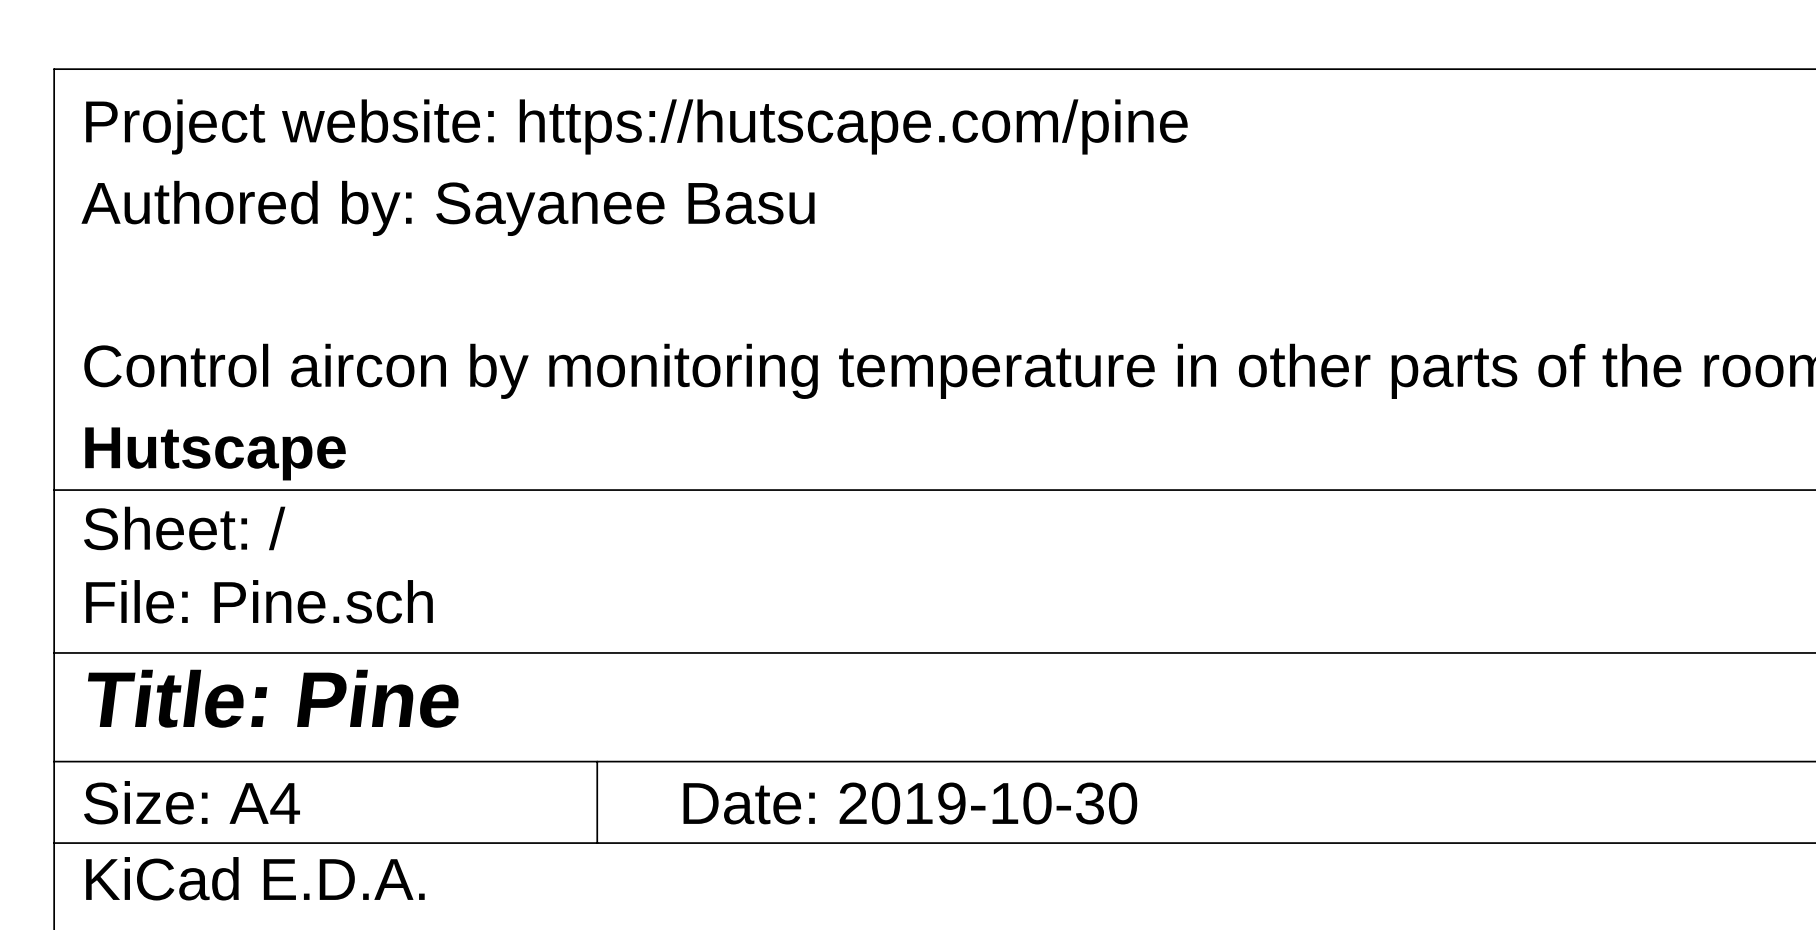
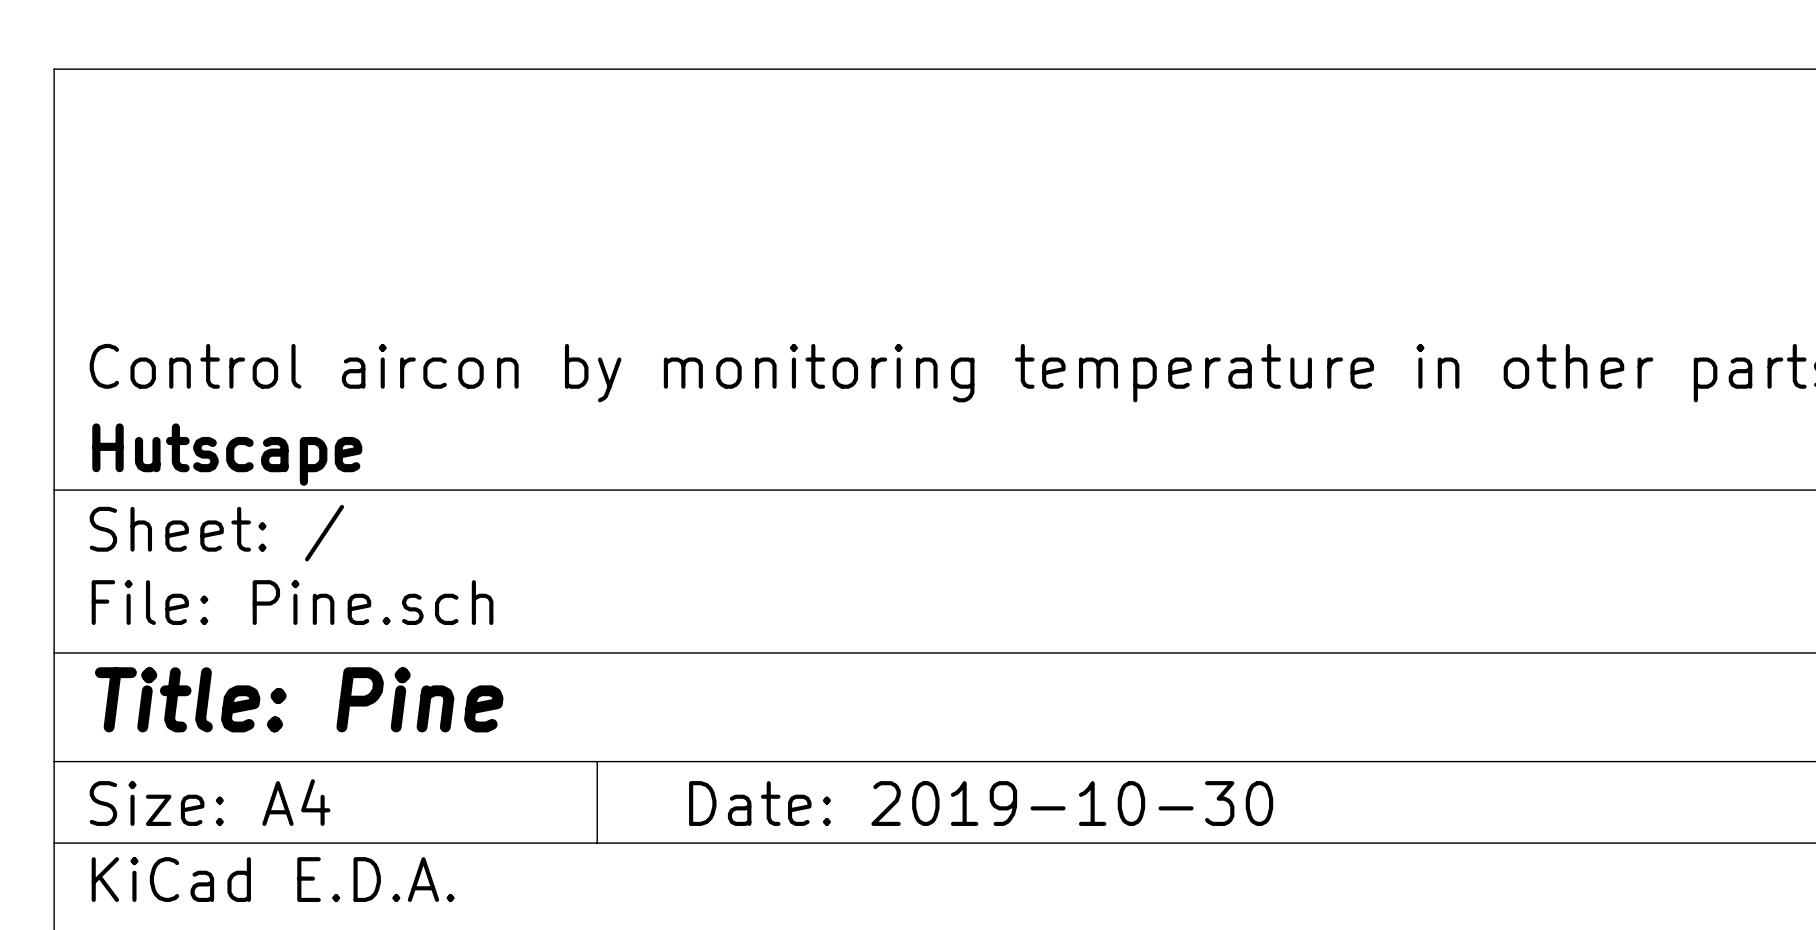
title block: Project website: https://hutscape.com/pine (636, 126) -> none
title block: Authored by: Sayanee Basu (448, 208) -> none

